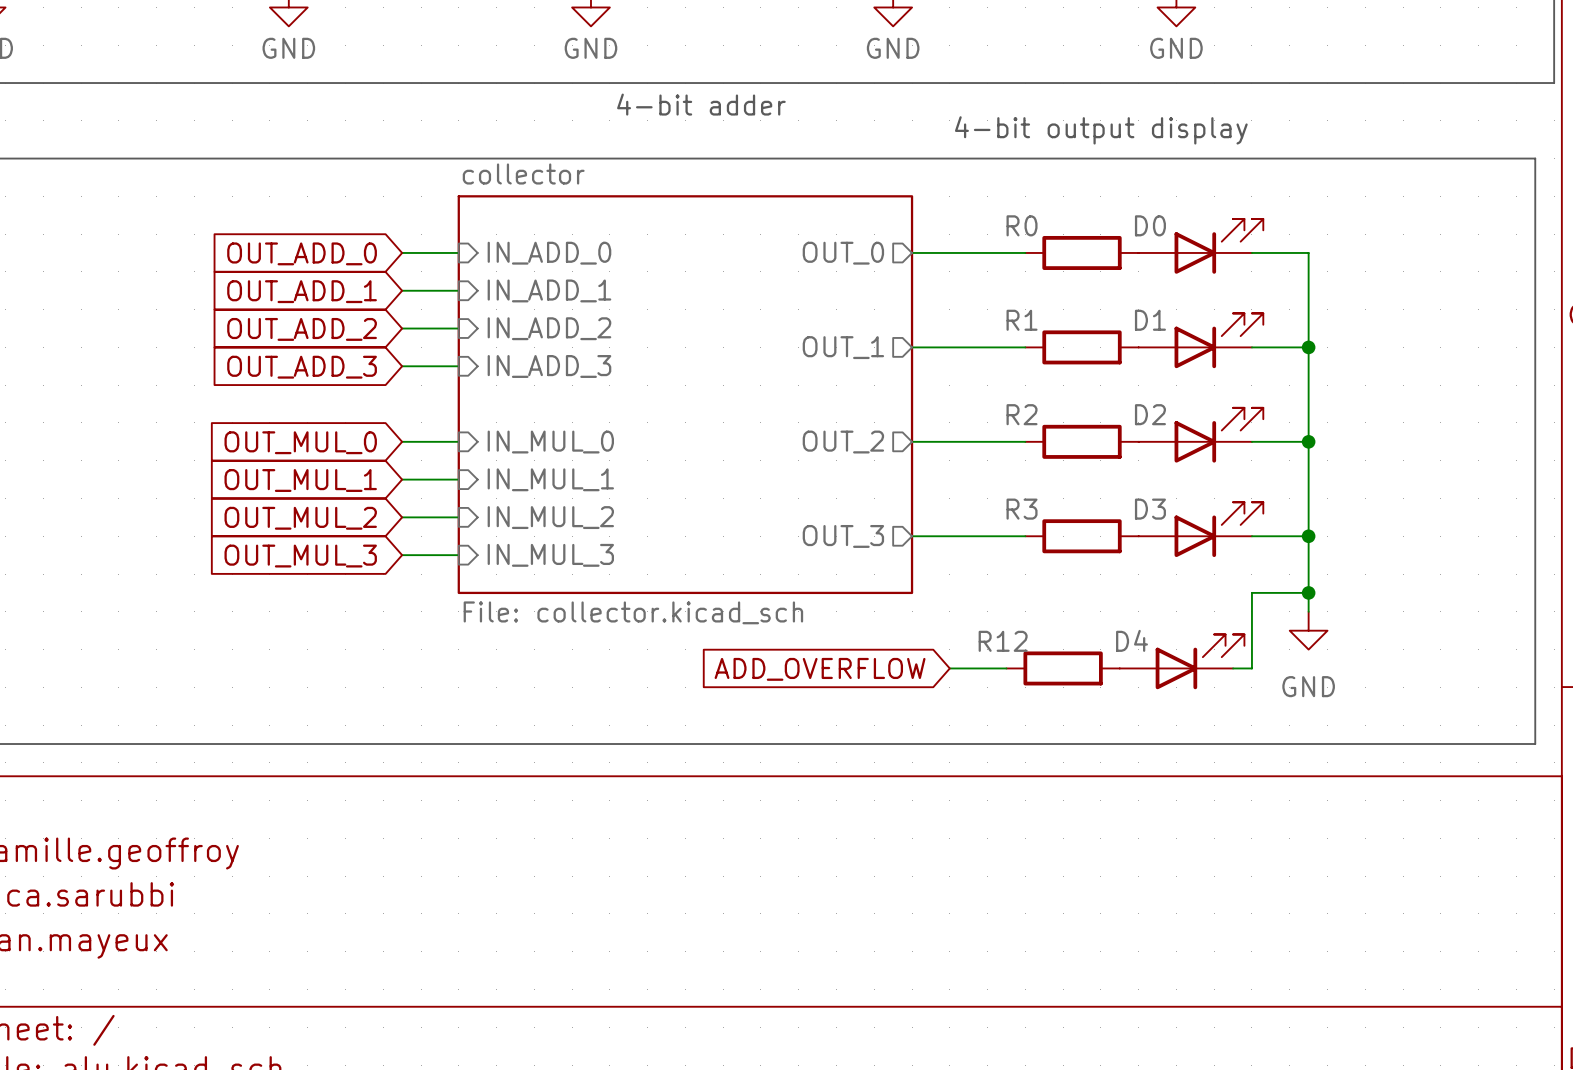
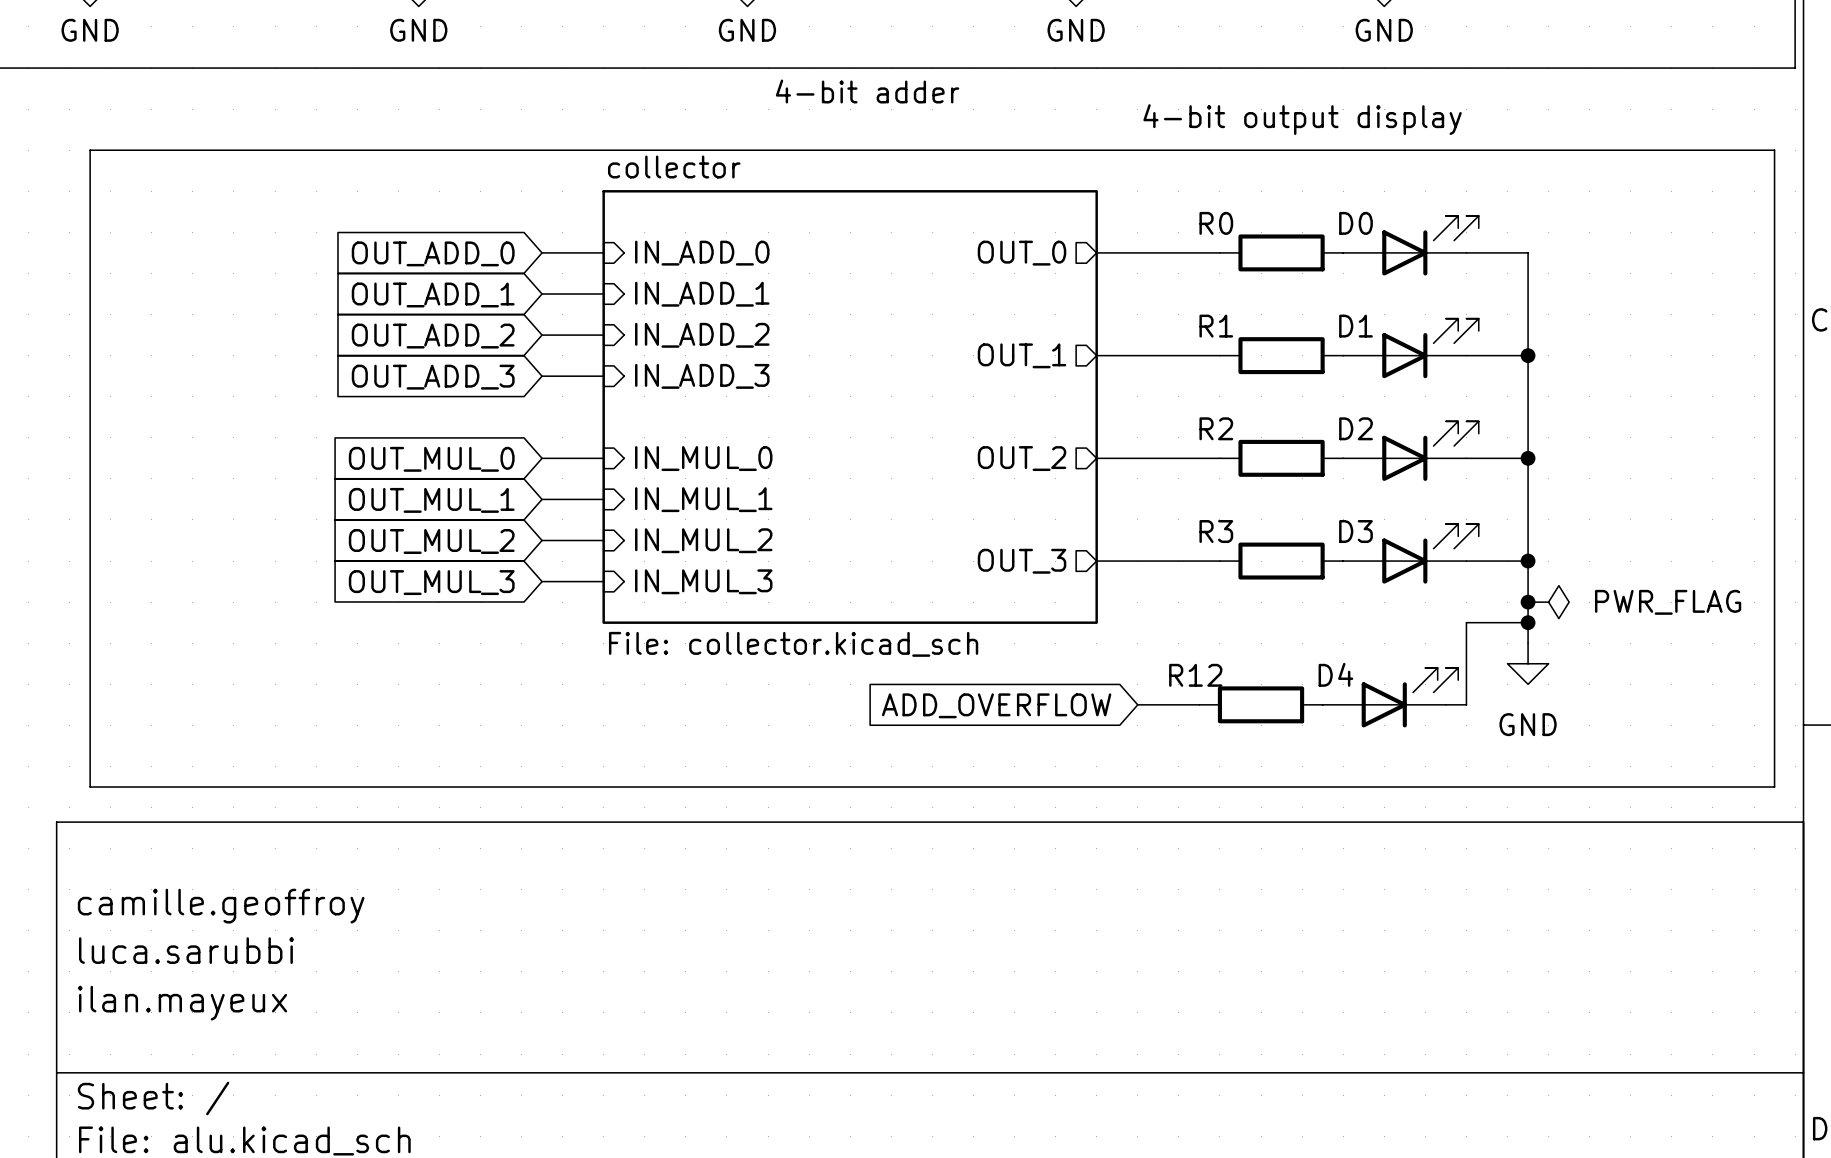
junction: none -> (1528, 602)
power symbol: none -> PWR_FLAG (1548, 602)

